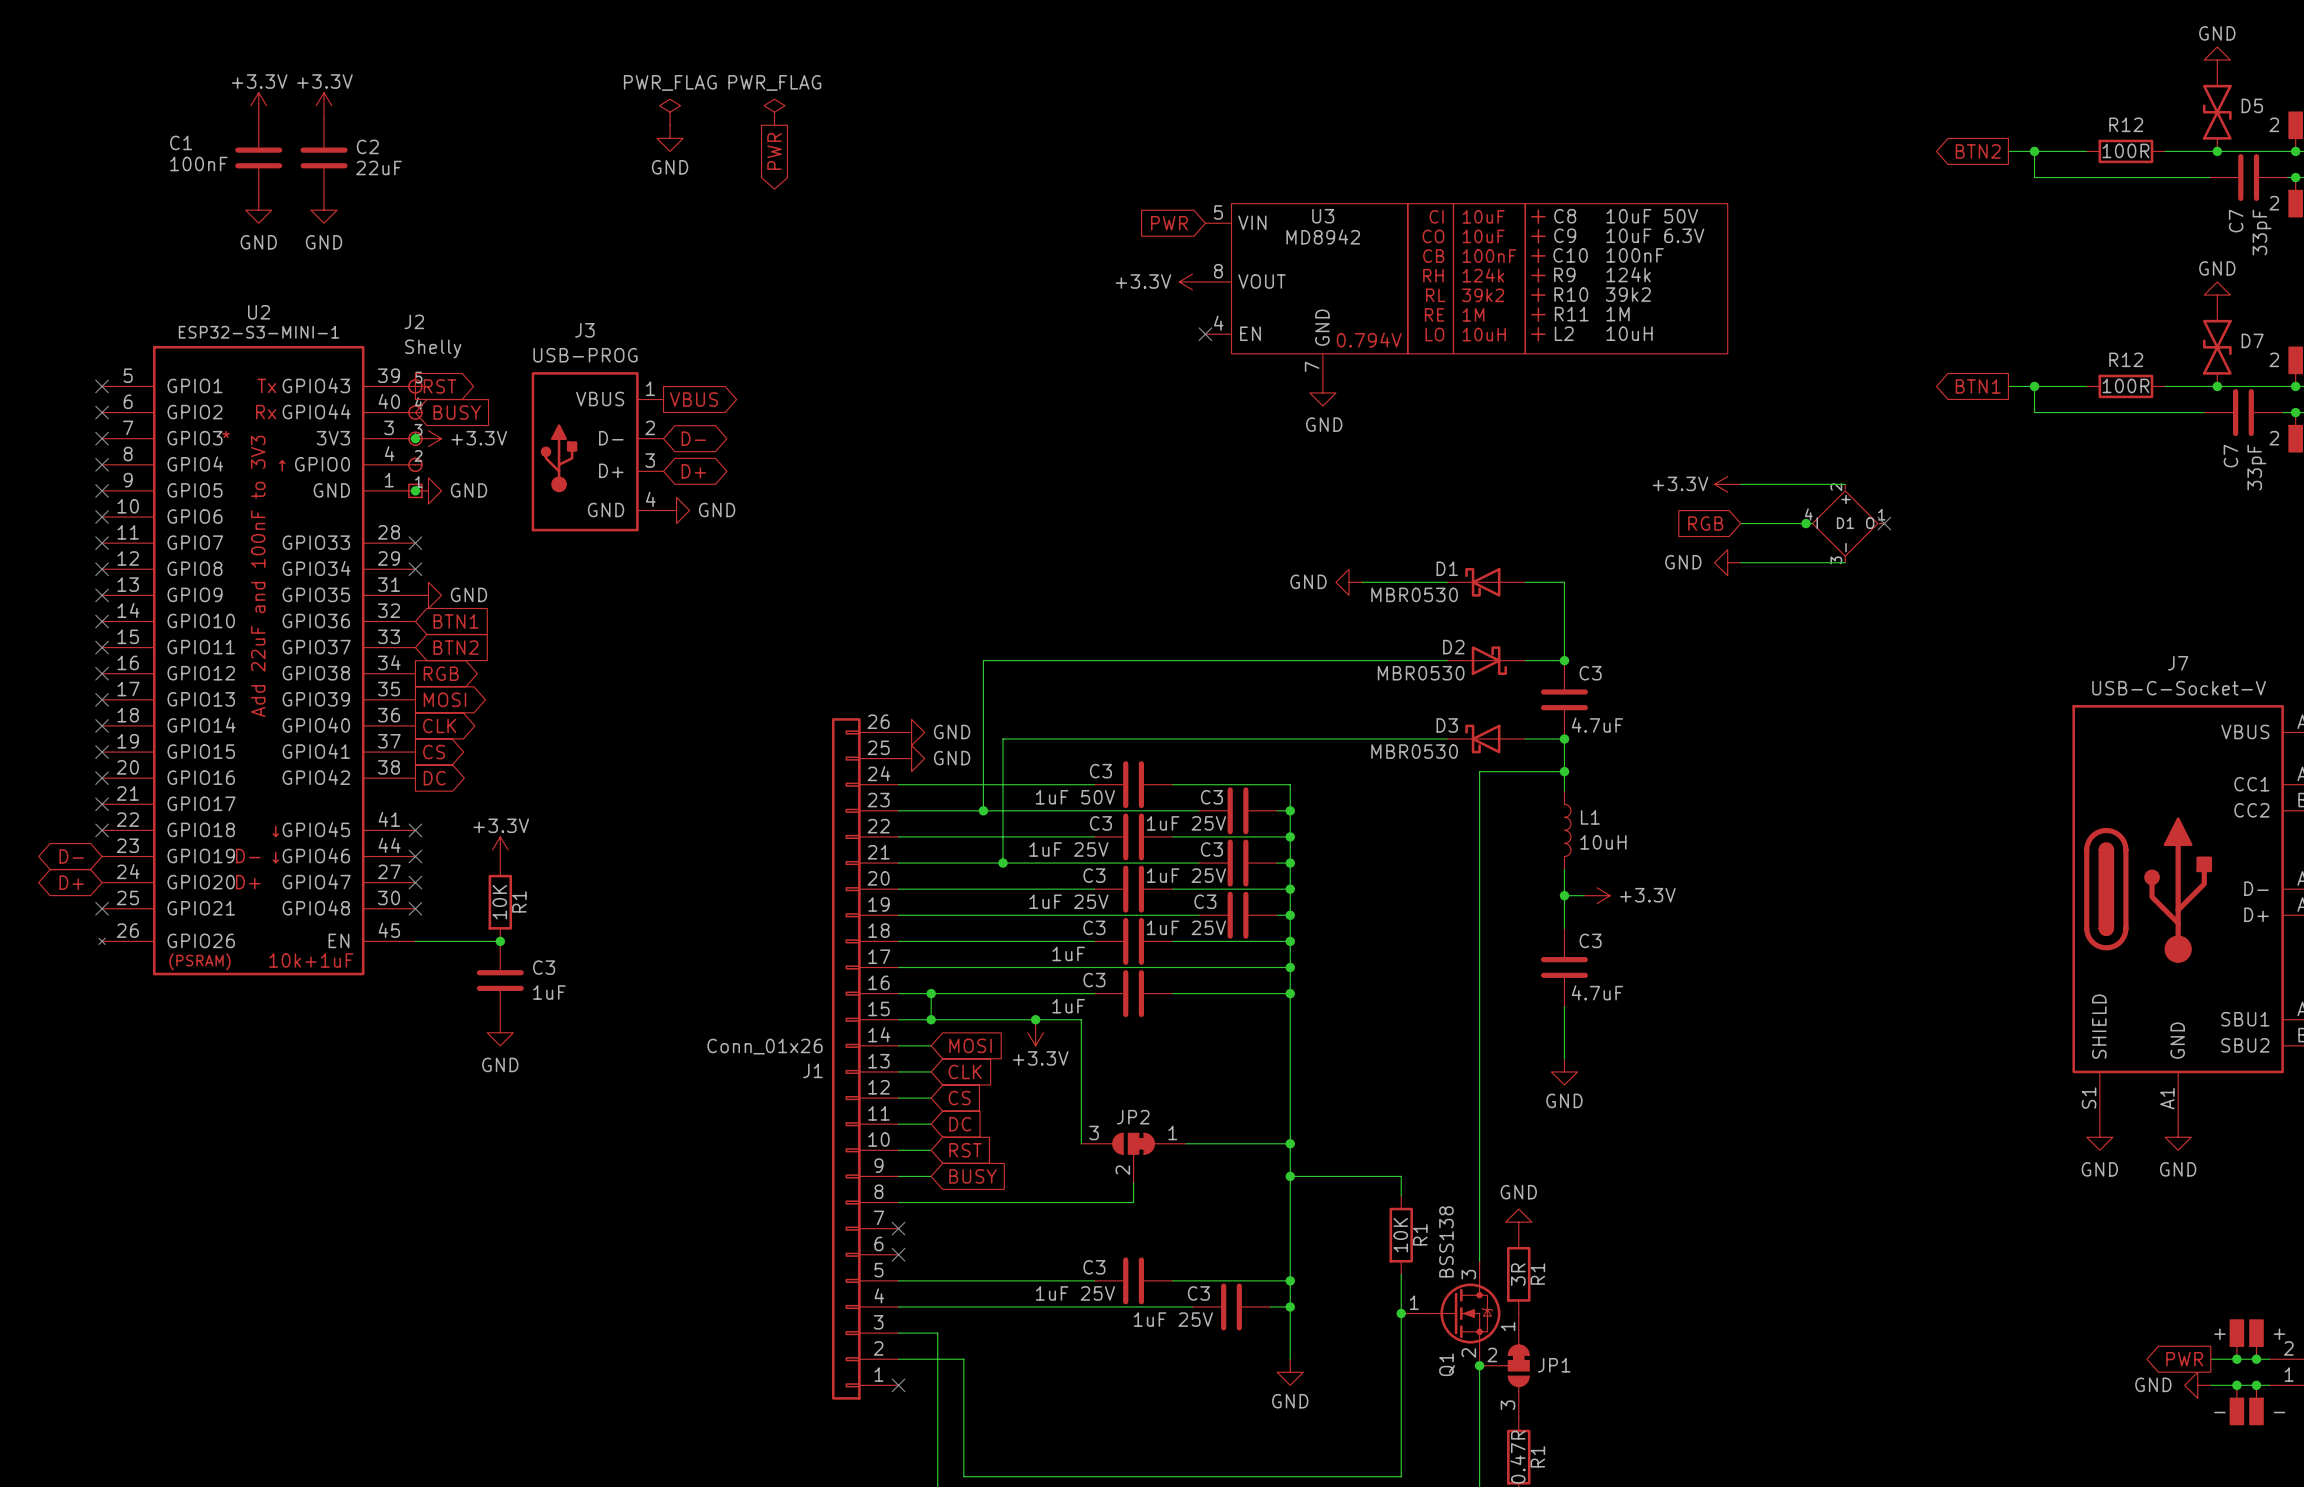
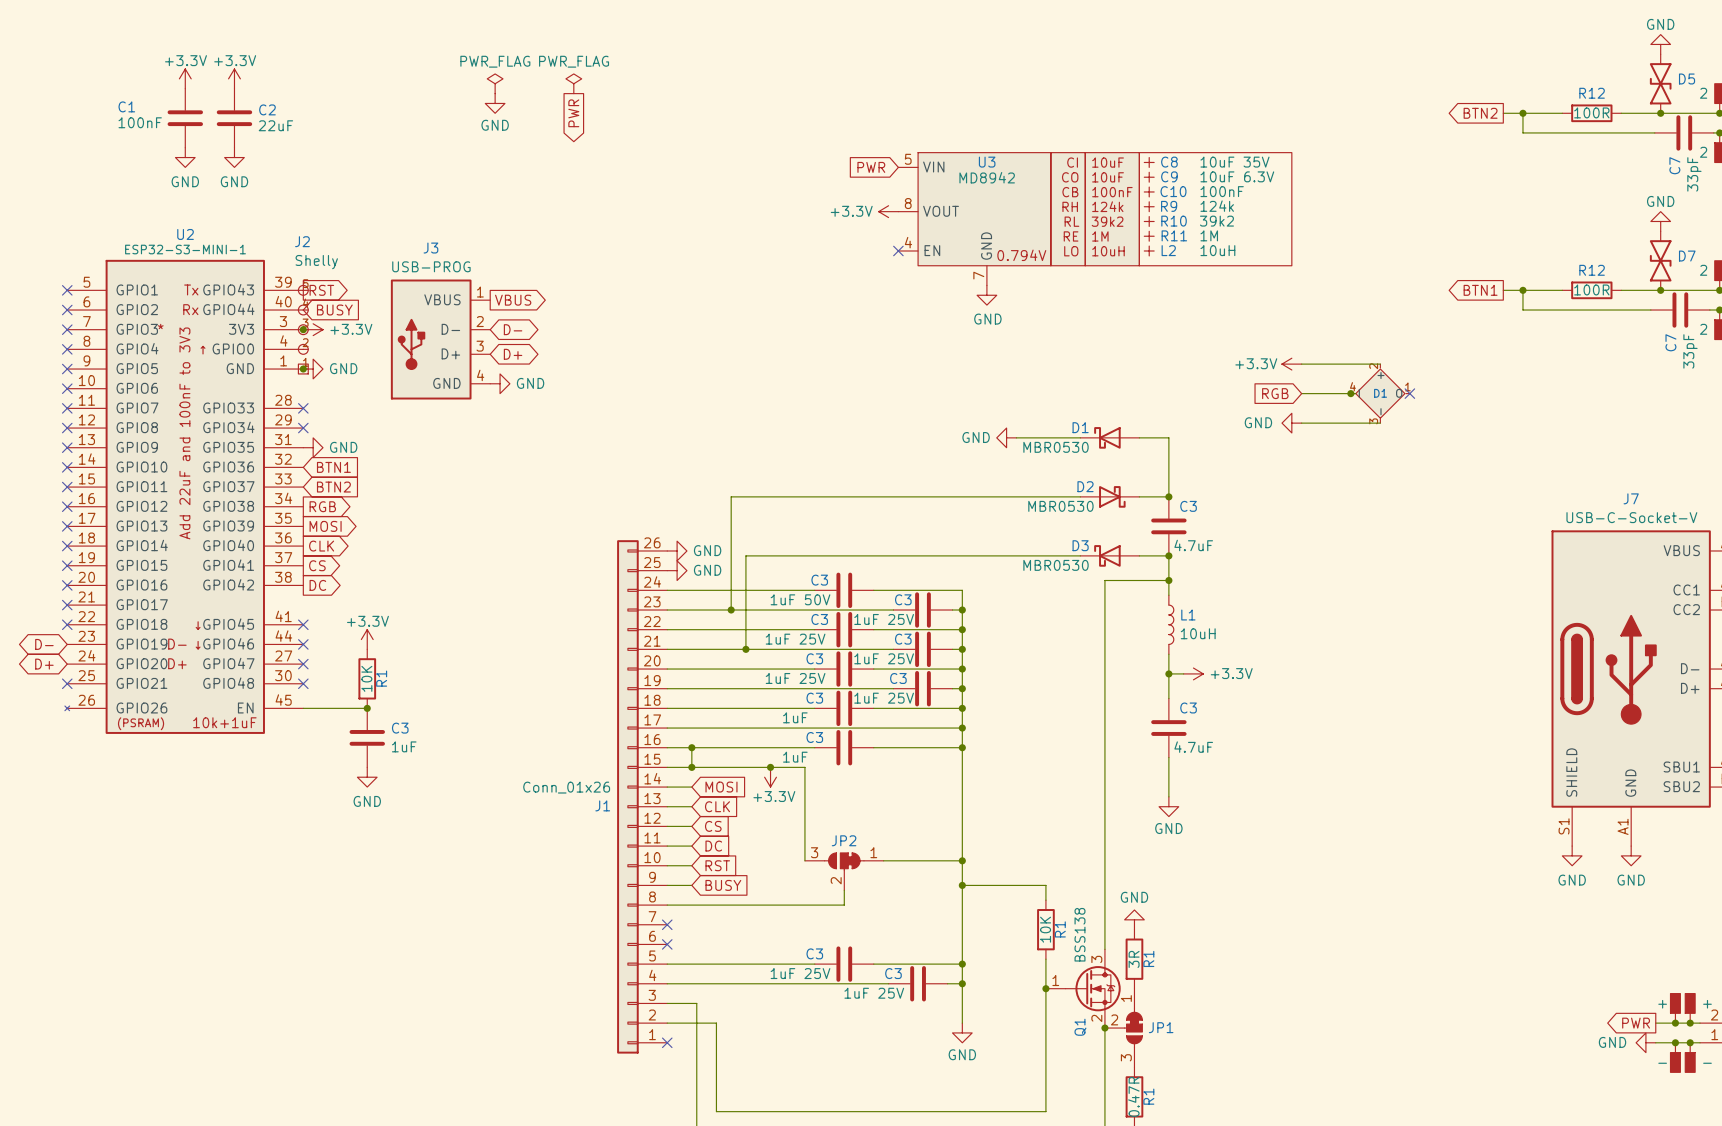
C8 value: 10uF 50V (1652, 216) -> 10uF 35V (1235, 162)

